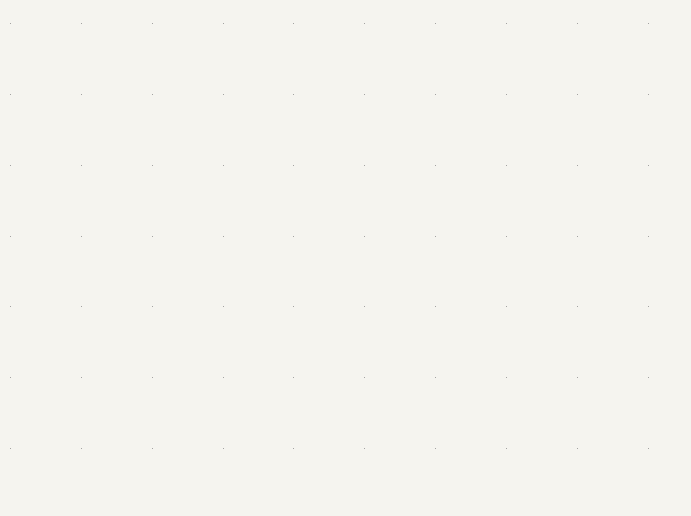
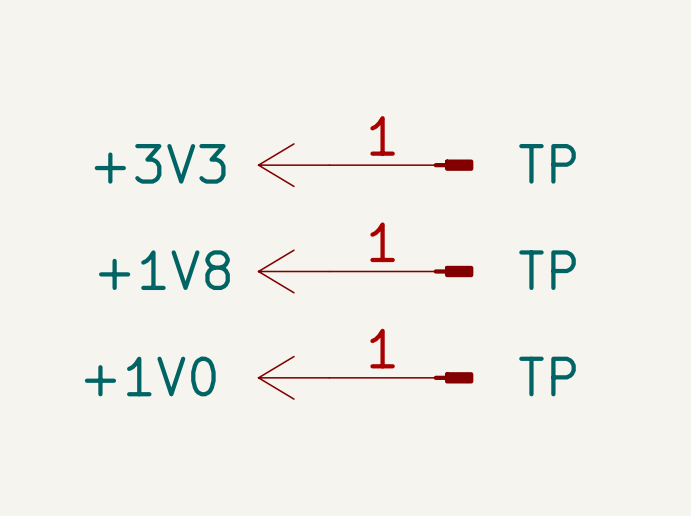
power symbol: none -> +3V3 (293, 165)
part: none -> TP (401, 165)
power symbol: none -> +1V8 (293, 271)
part: none -> TP (401, 271)
power symbol: none -> +1V0 (293, 377)
part: none -> TP (401, 377)

